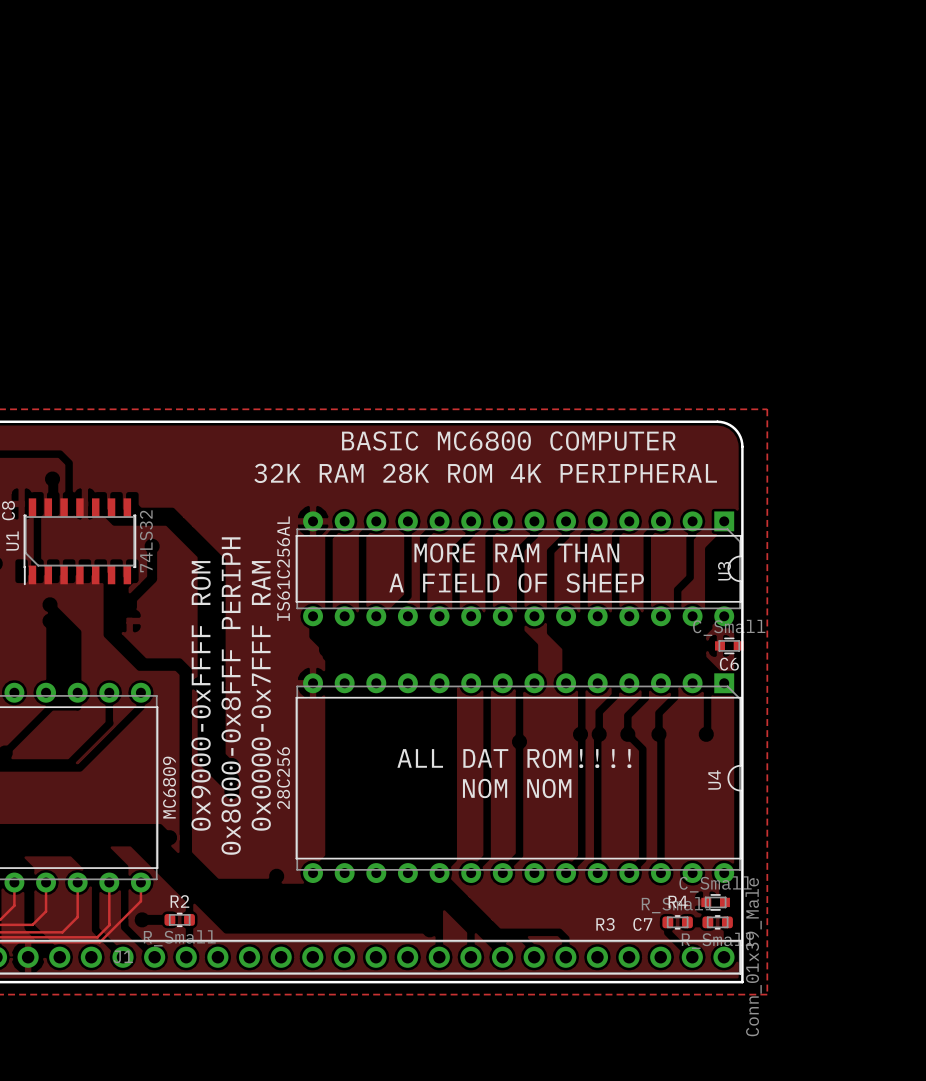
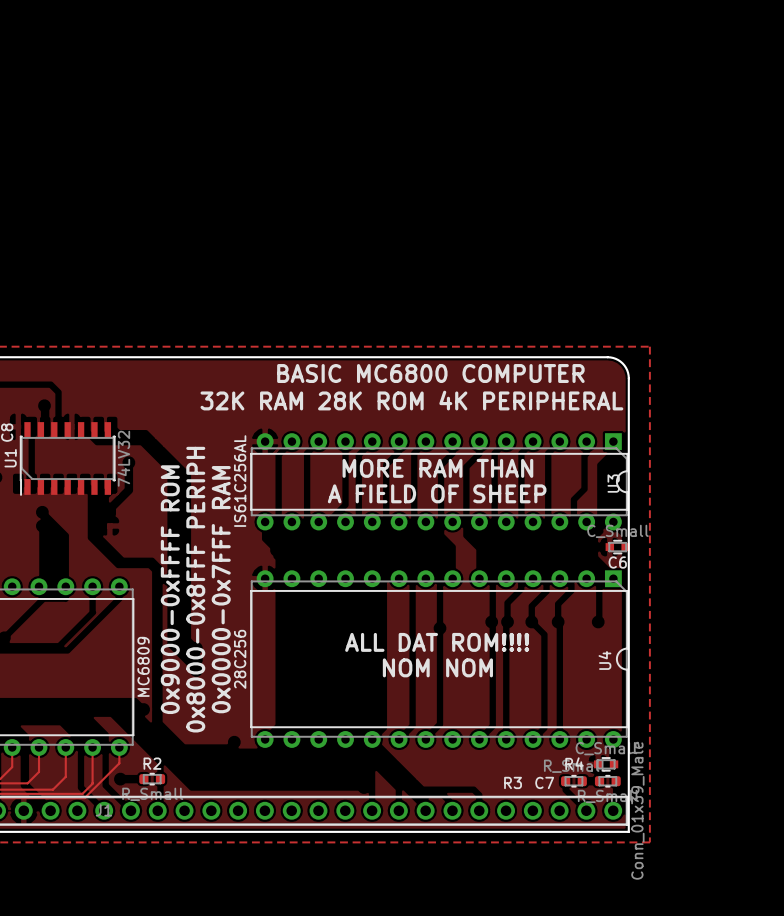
U1 value: 74LS32 (146, 541) -> 74LV32 (123, 458)

